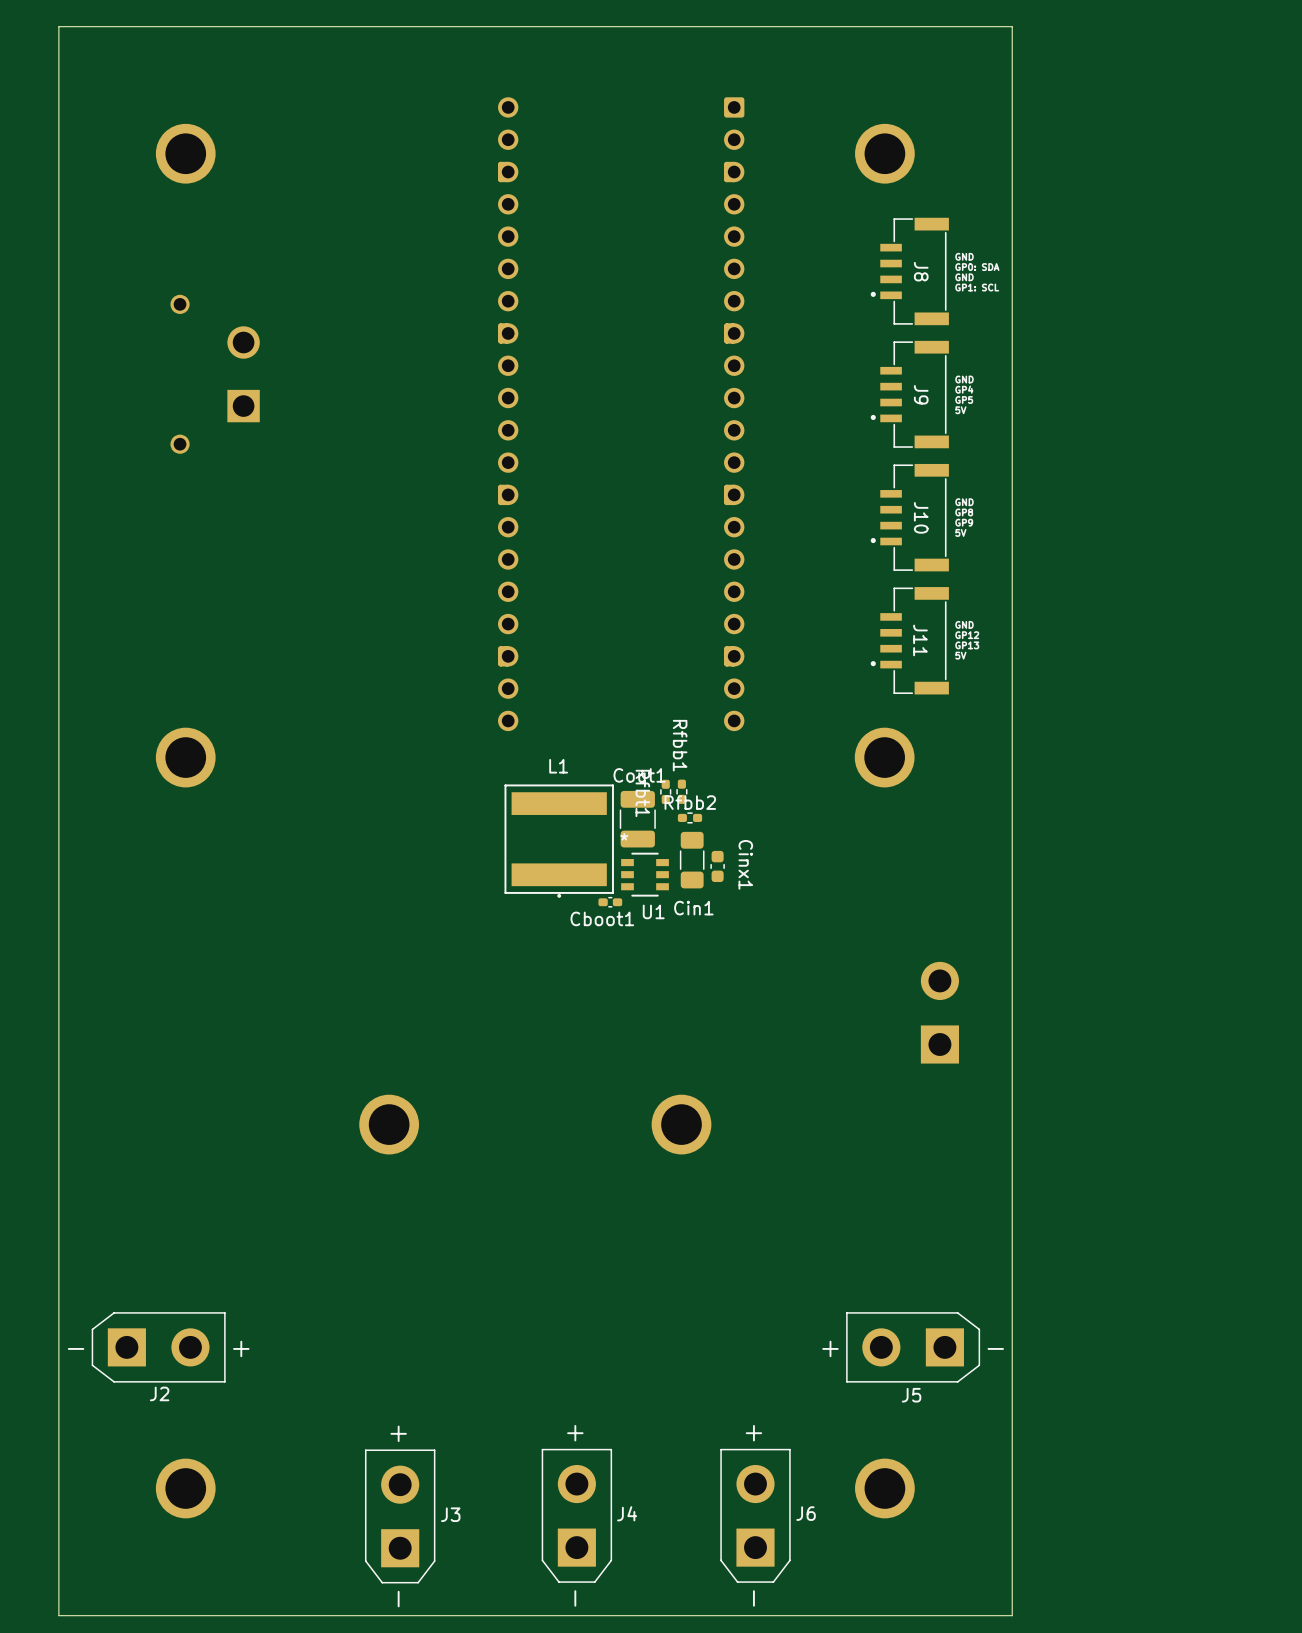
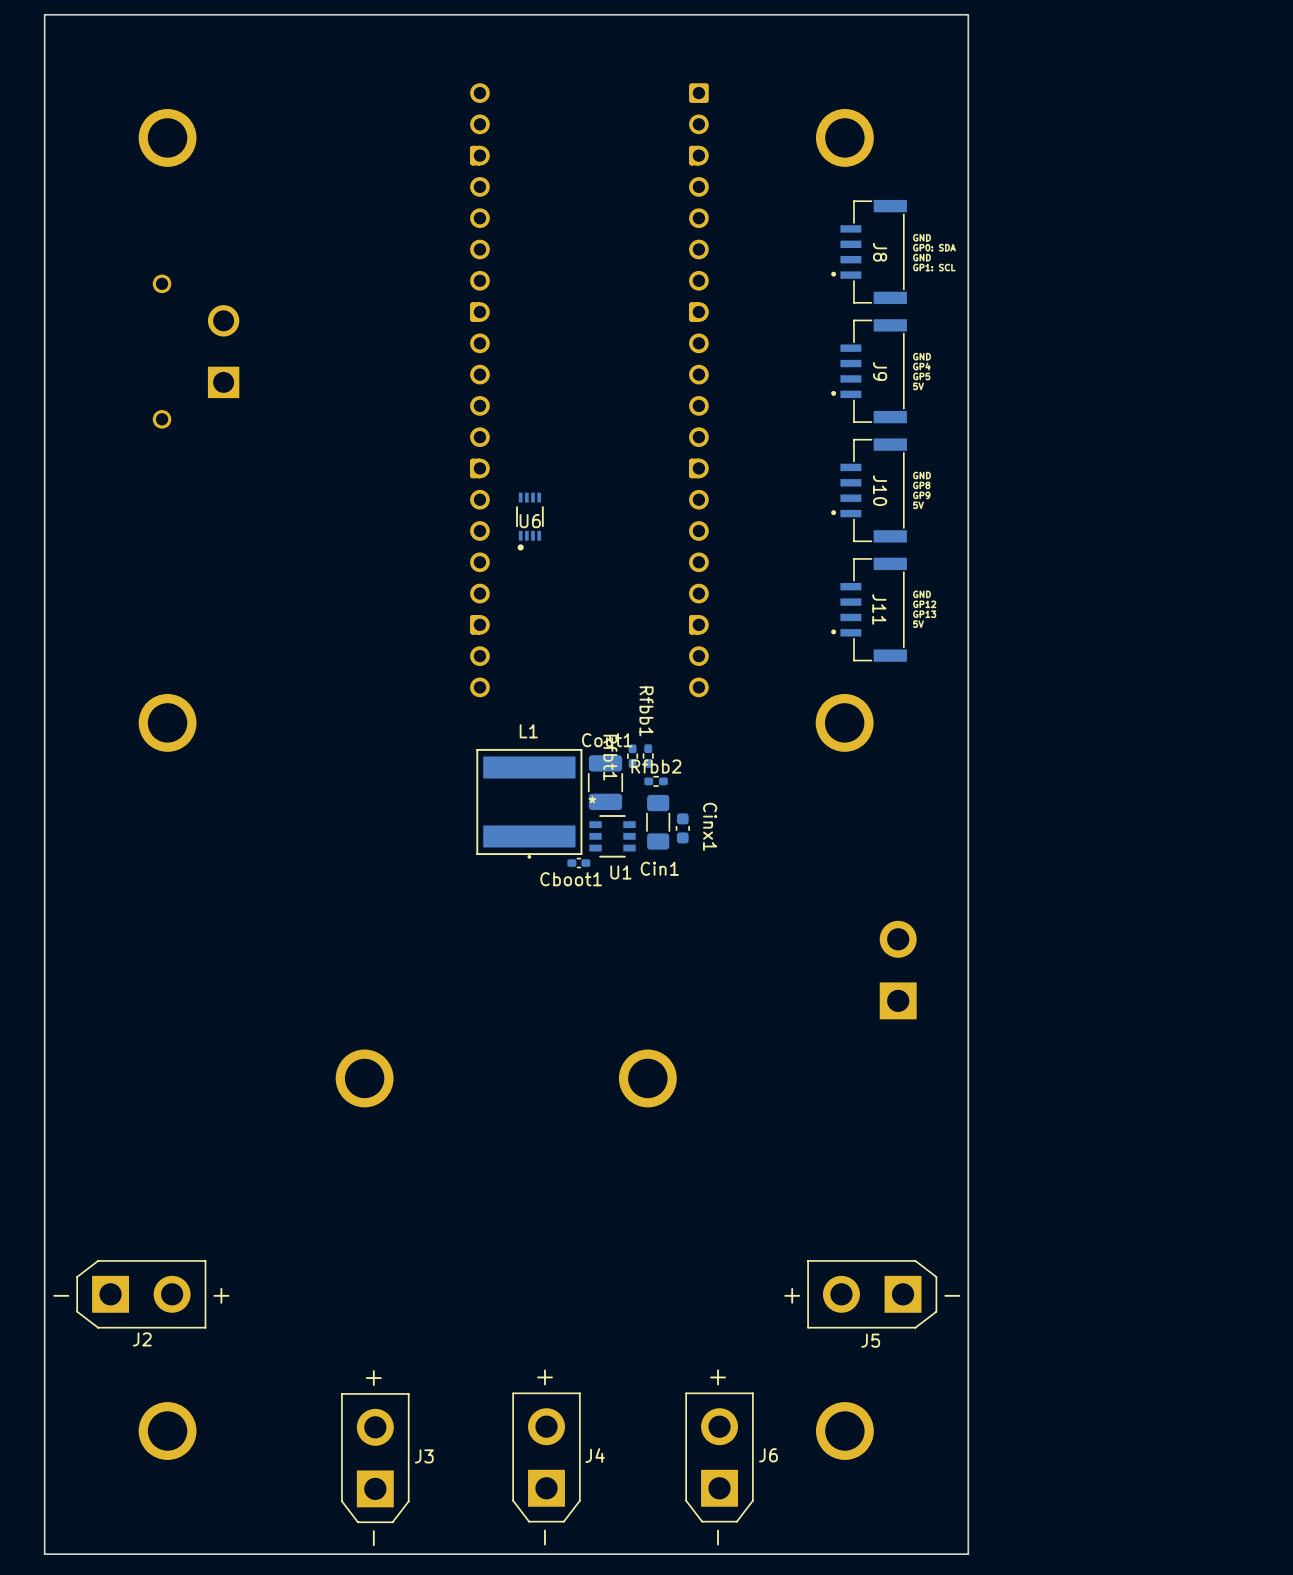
U6: none -> (529, 521)

